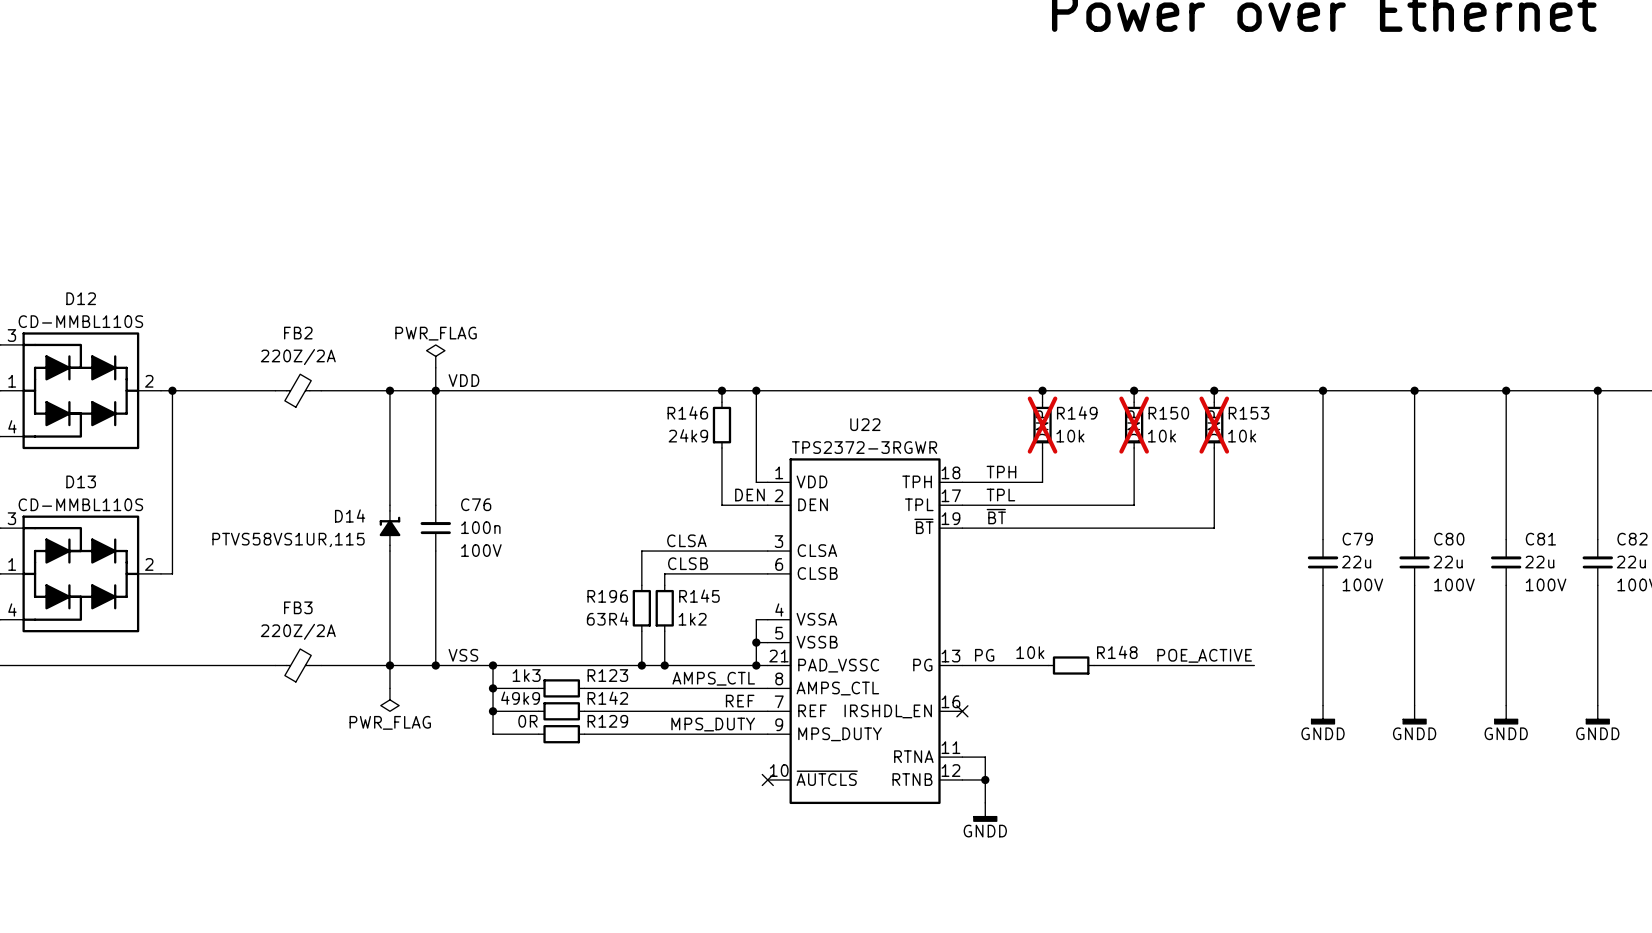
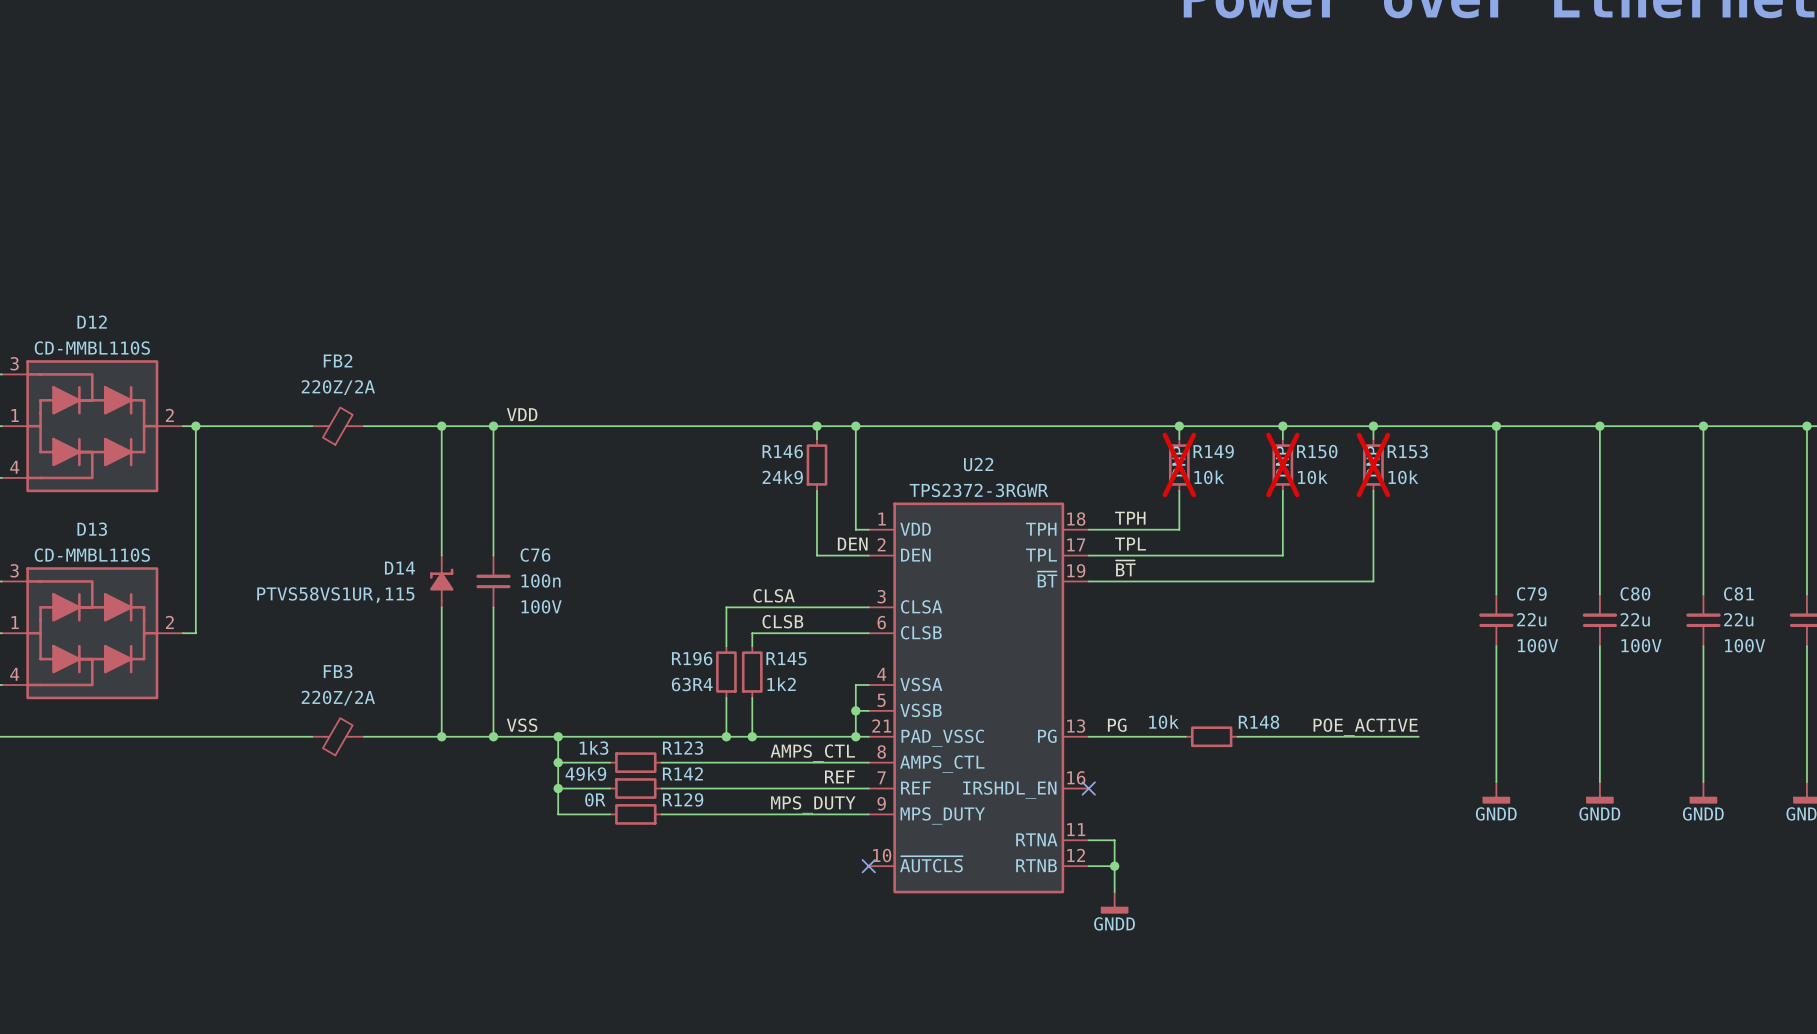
power symbol: PWR_FLAG (435, 356) -> none
wire: (435, 367) (435, 390) -> none
wire: (389, 665) (389, 688) -> none
power symbol: PWR_FLAG (389, 699) -> none

